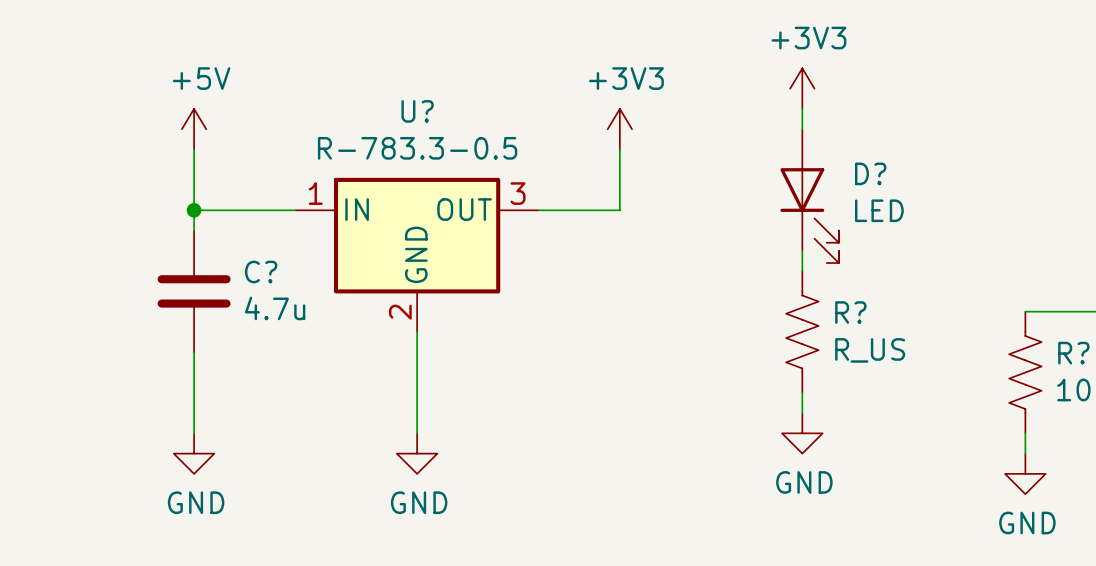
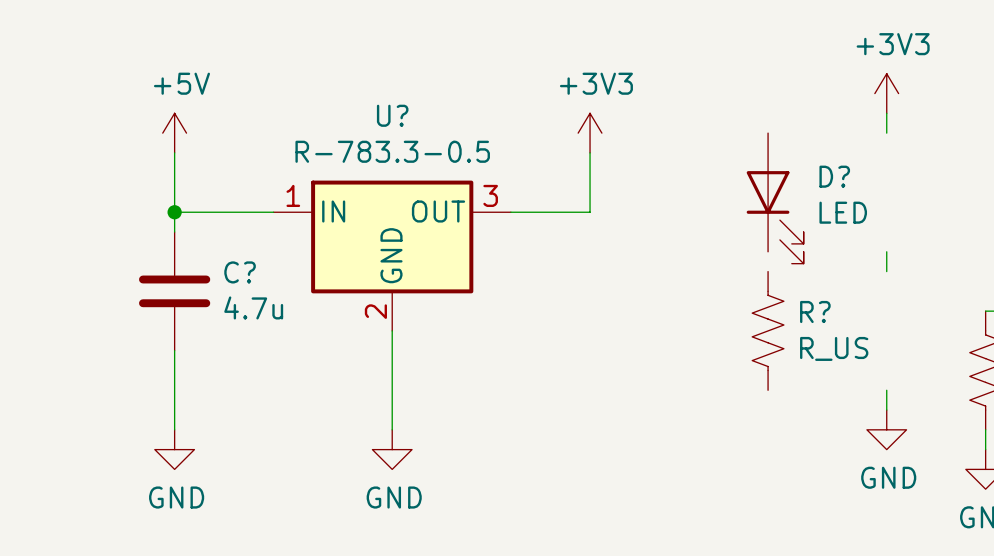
power symbol position: +3V3 (802, 88) -> +3V3 (886, 93)
wire: (802, 108) (802, 129) -> (886, 113) (886, 133)
wire: (802, 250) (802, 271) -> (886, 251) (886, 271)
wire: (802, 392) (802, 413) -> (886, 390) (886, 410)
power symbol position: GND (802, 433) -> GND (886, 429)

